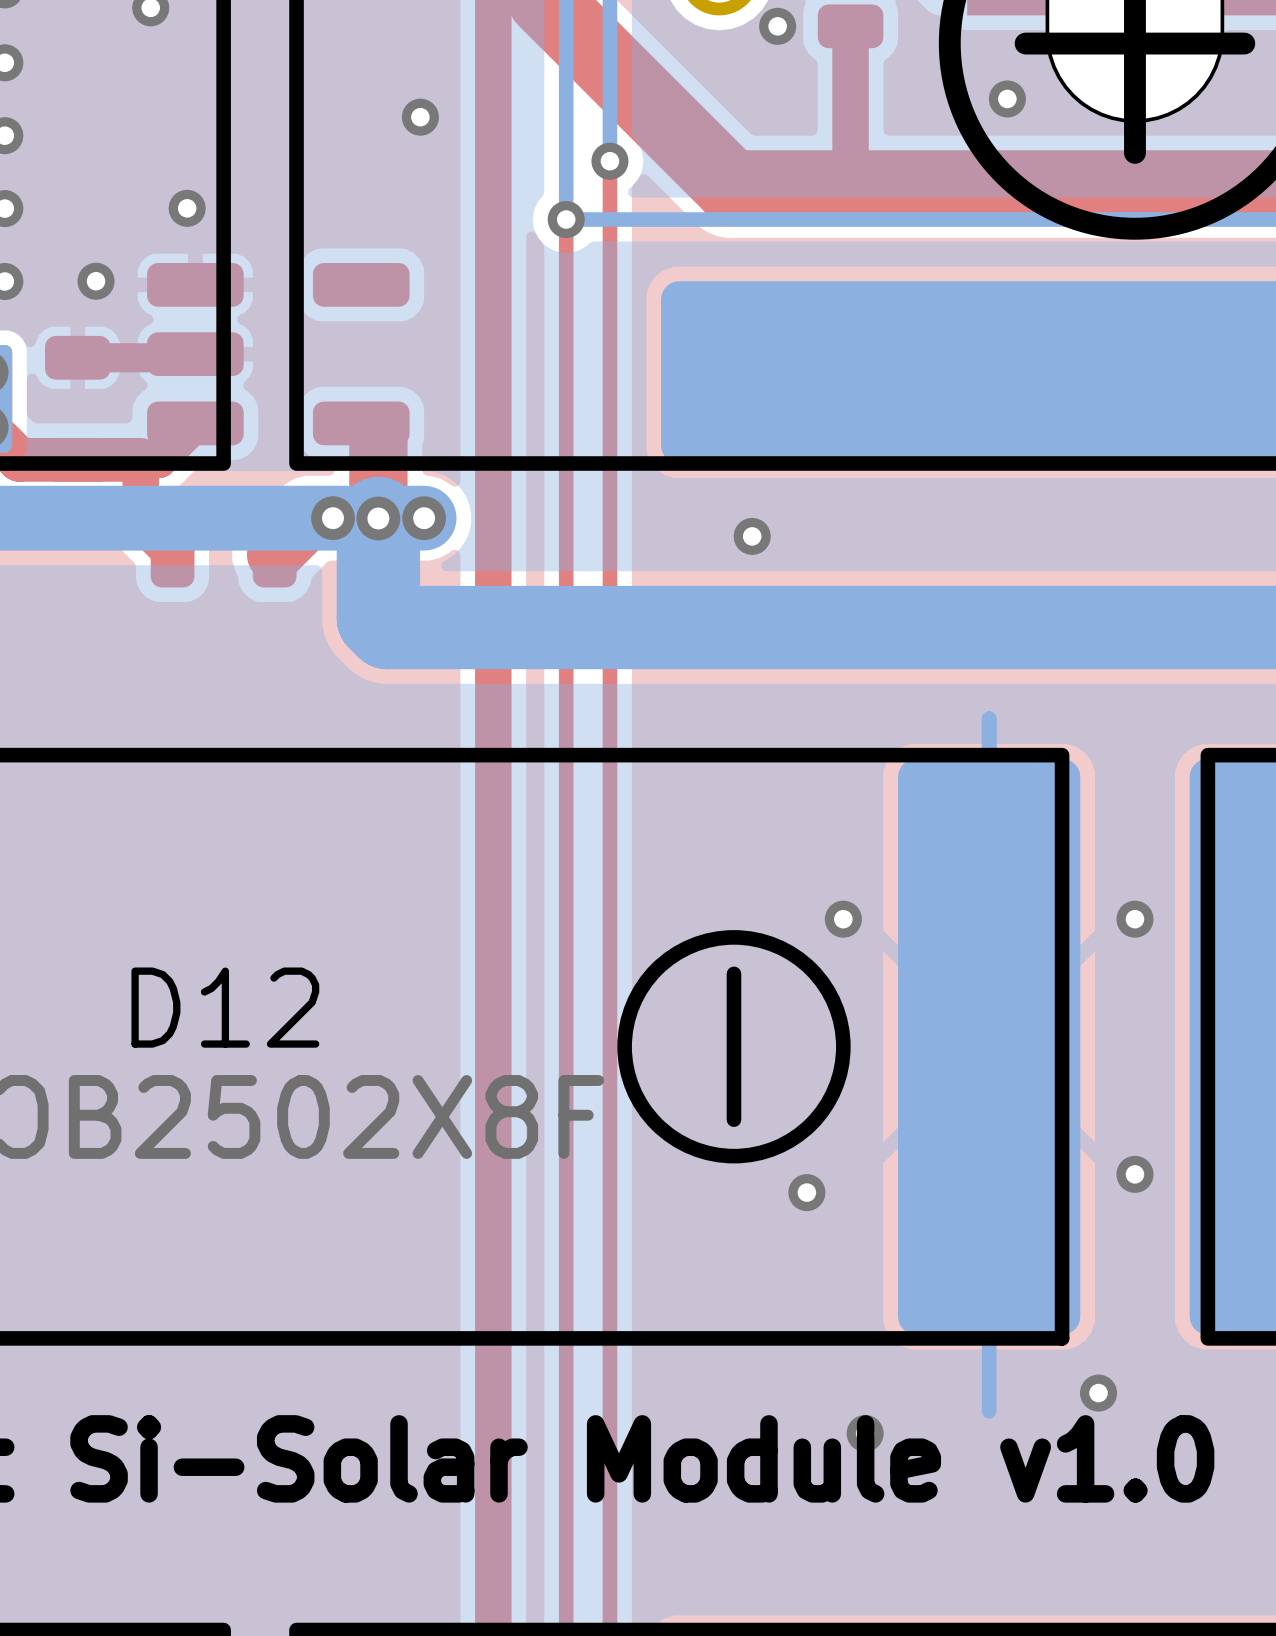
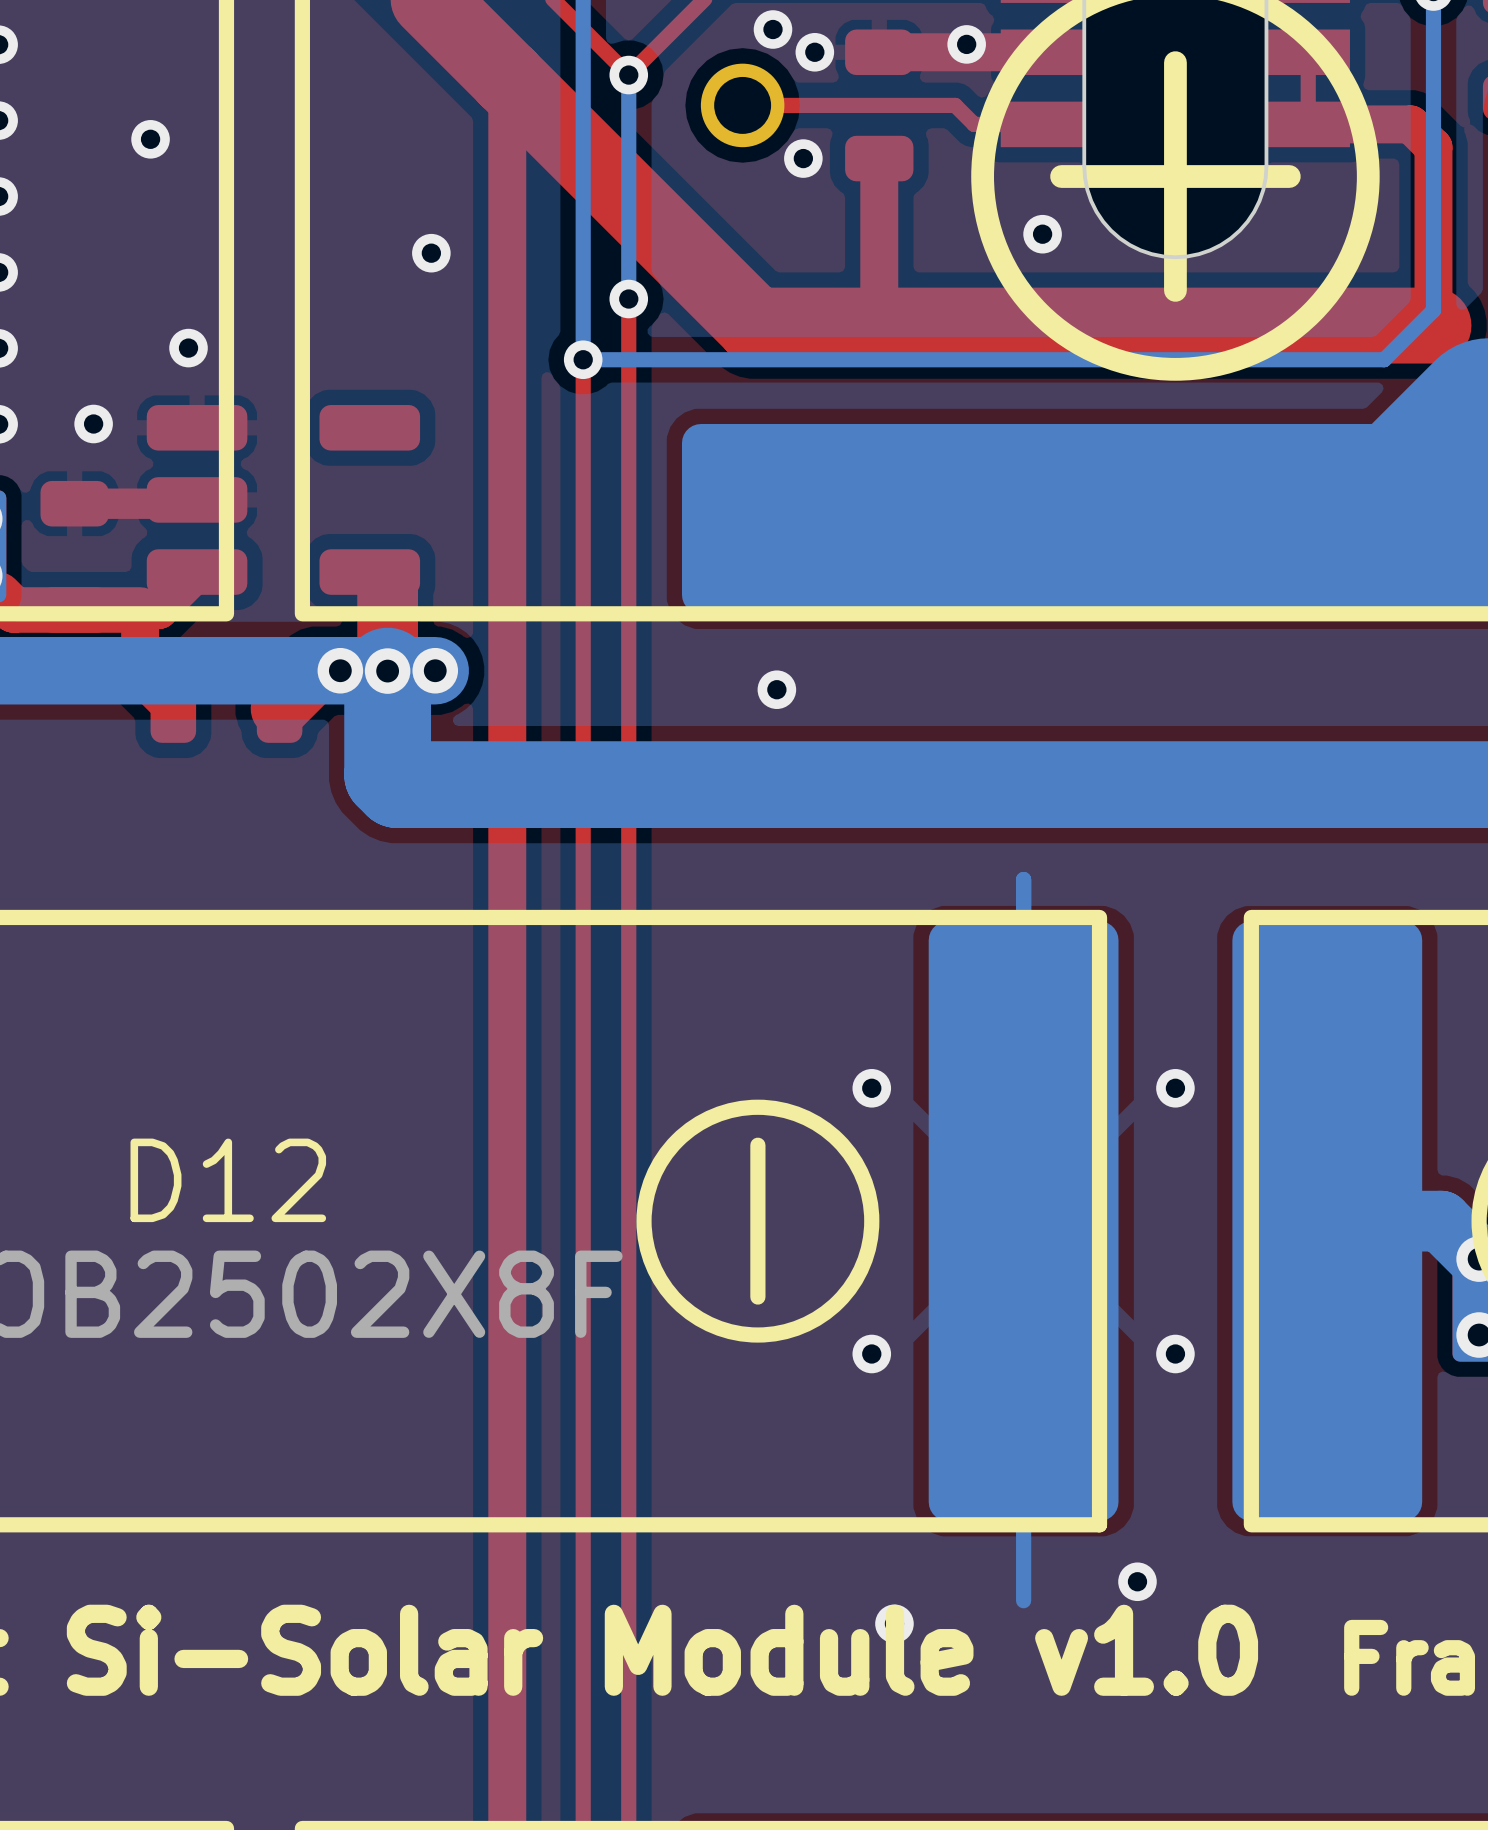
via position: (806, 1192) -> (871, 1353)

